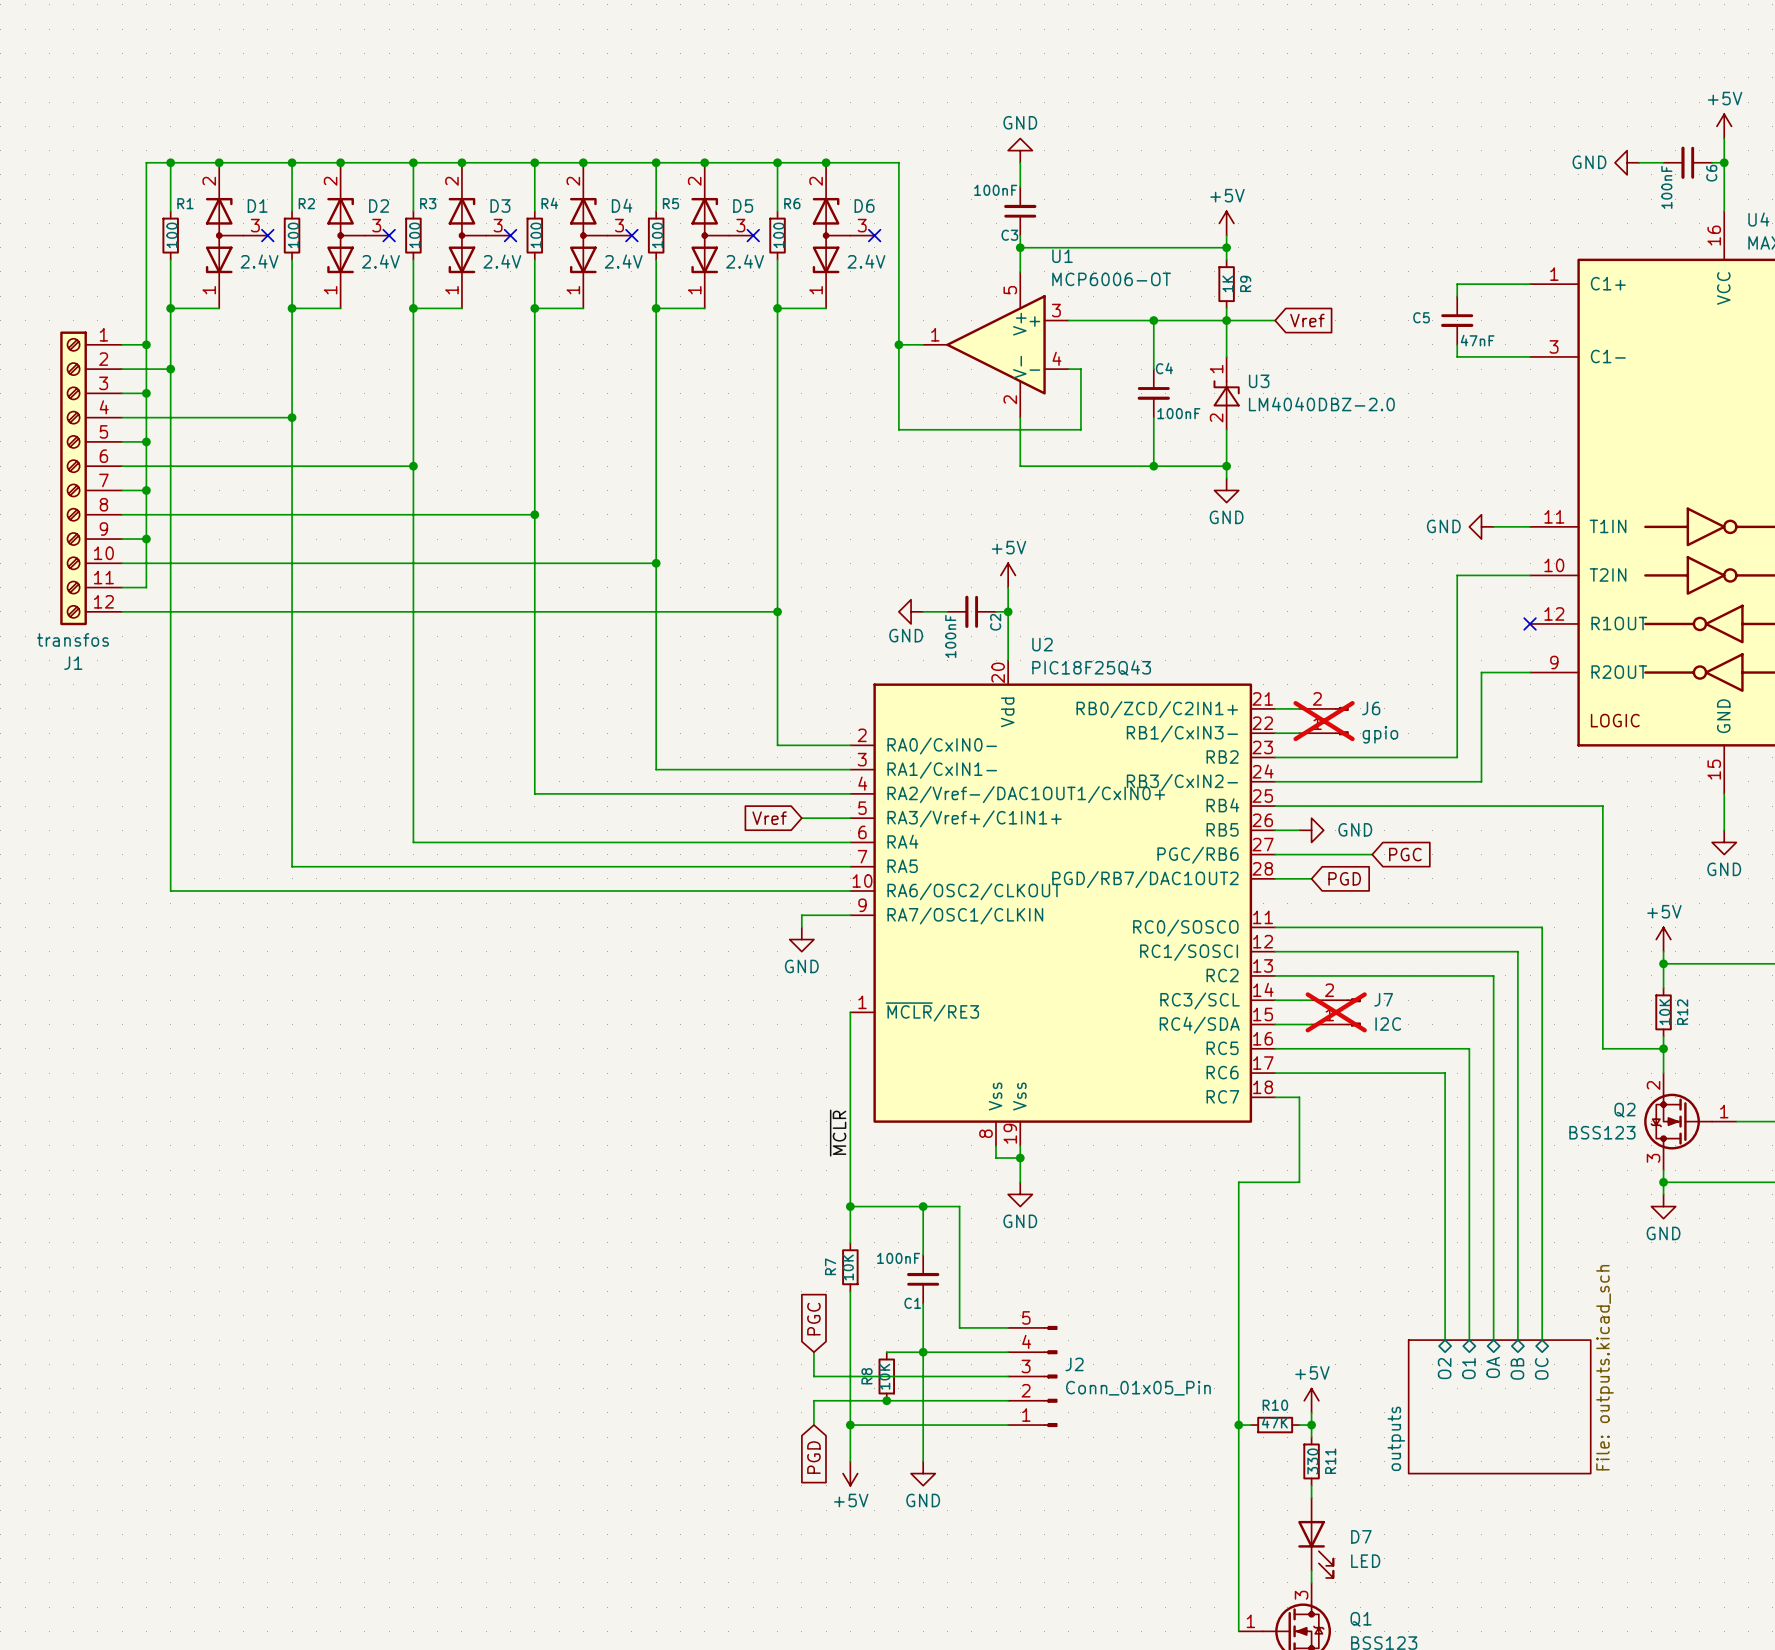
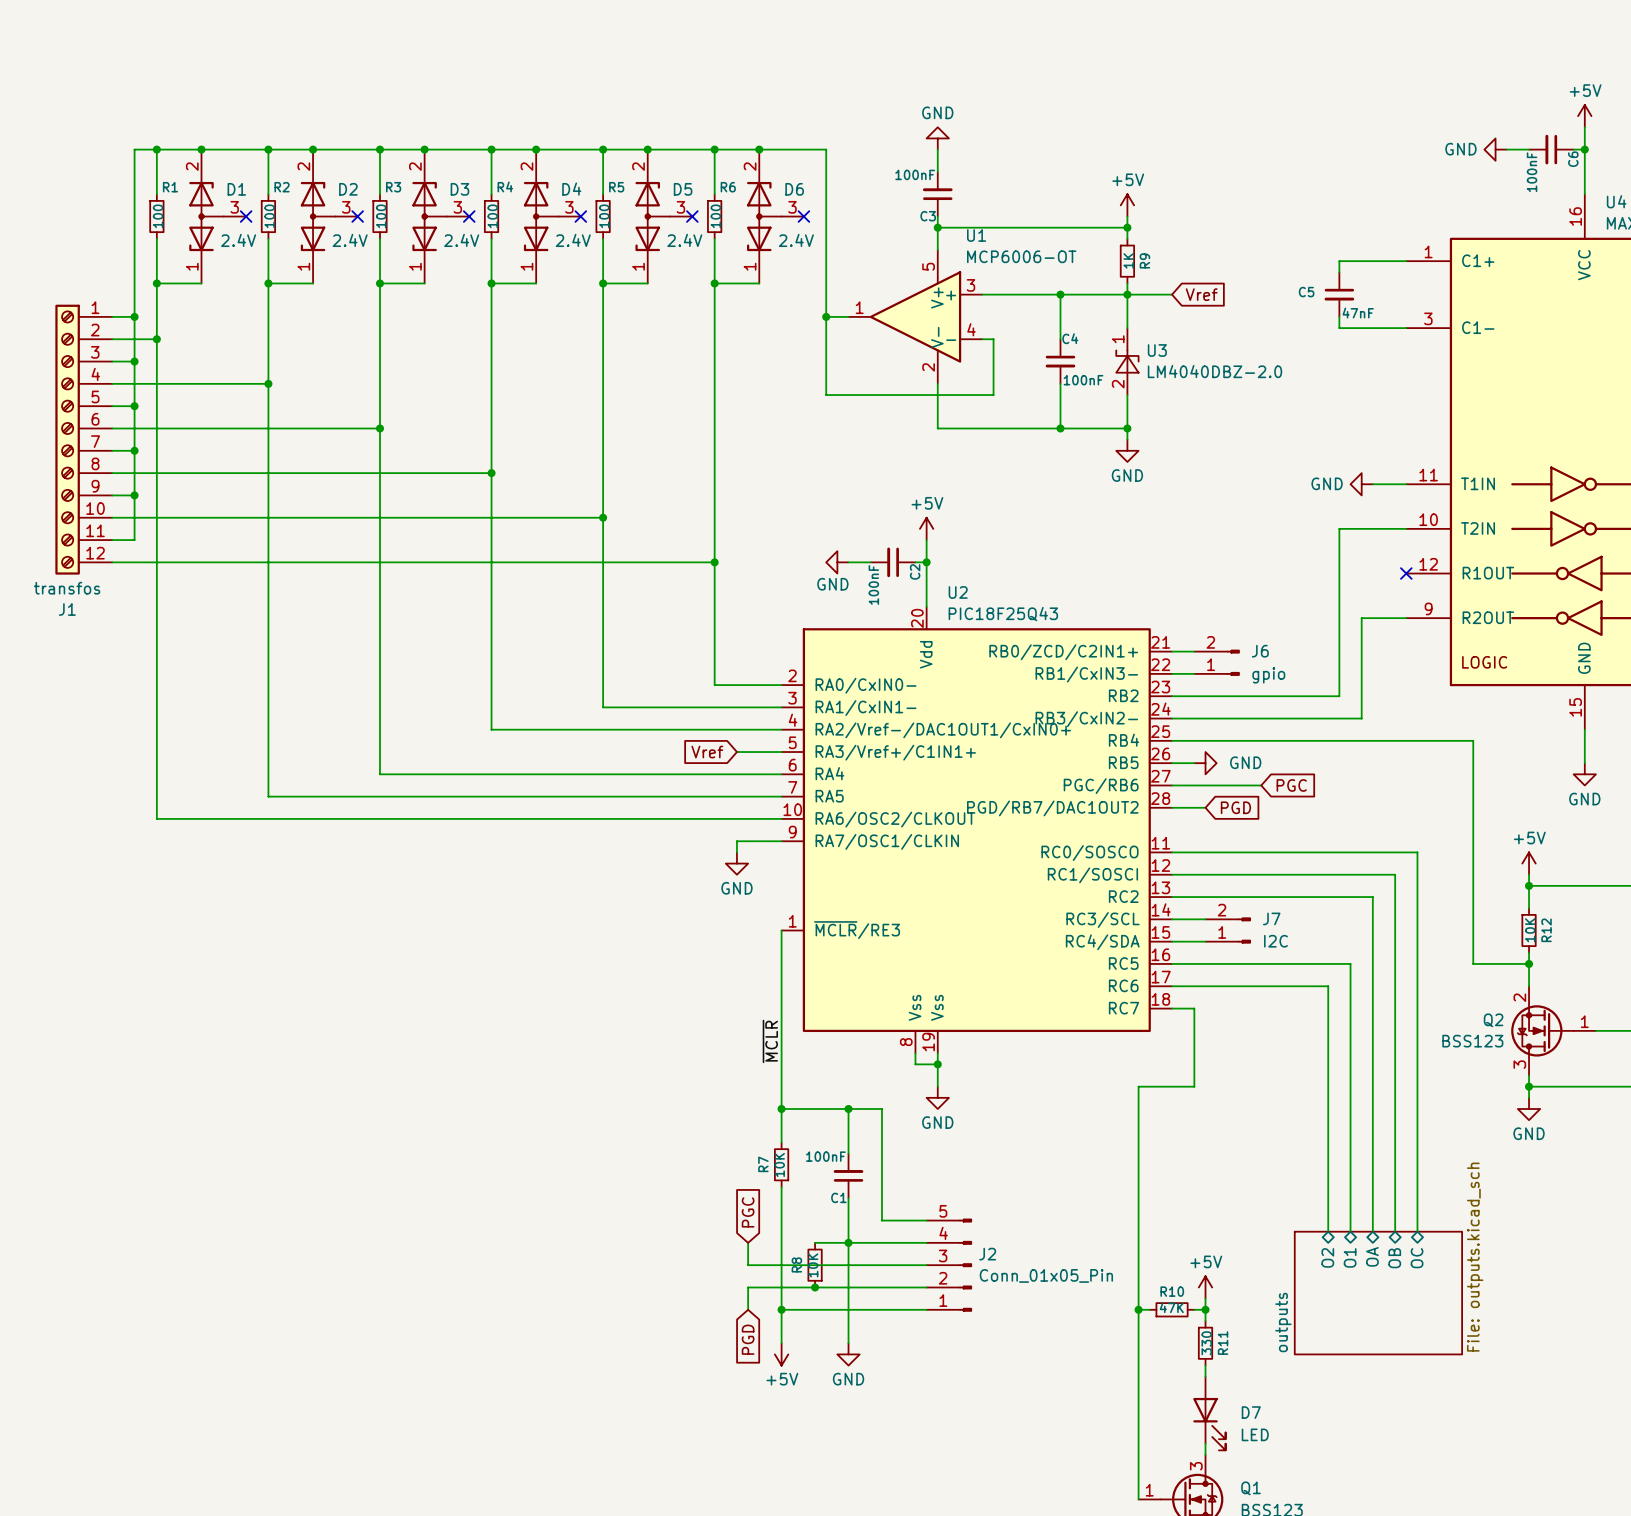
J6 do-not-place cross: (1324, 721) -> none
J7 do-not-place cross: (1336, 1012) -> none

